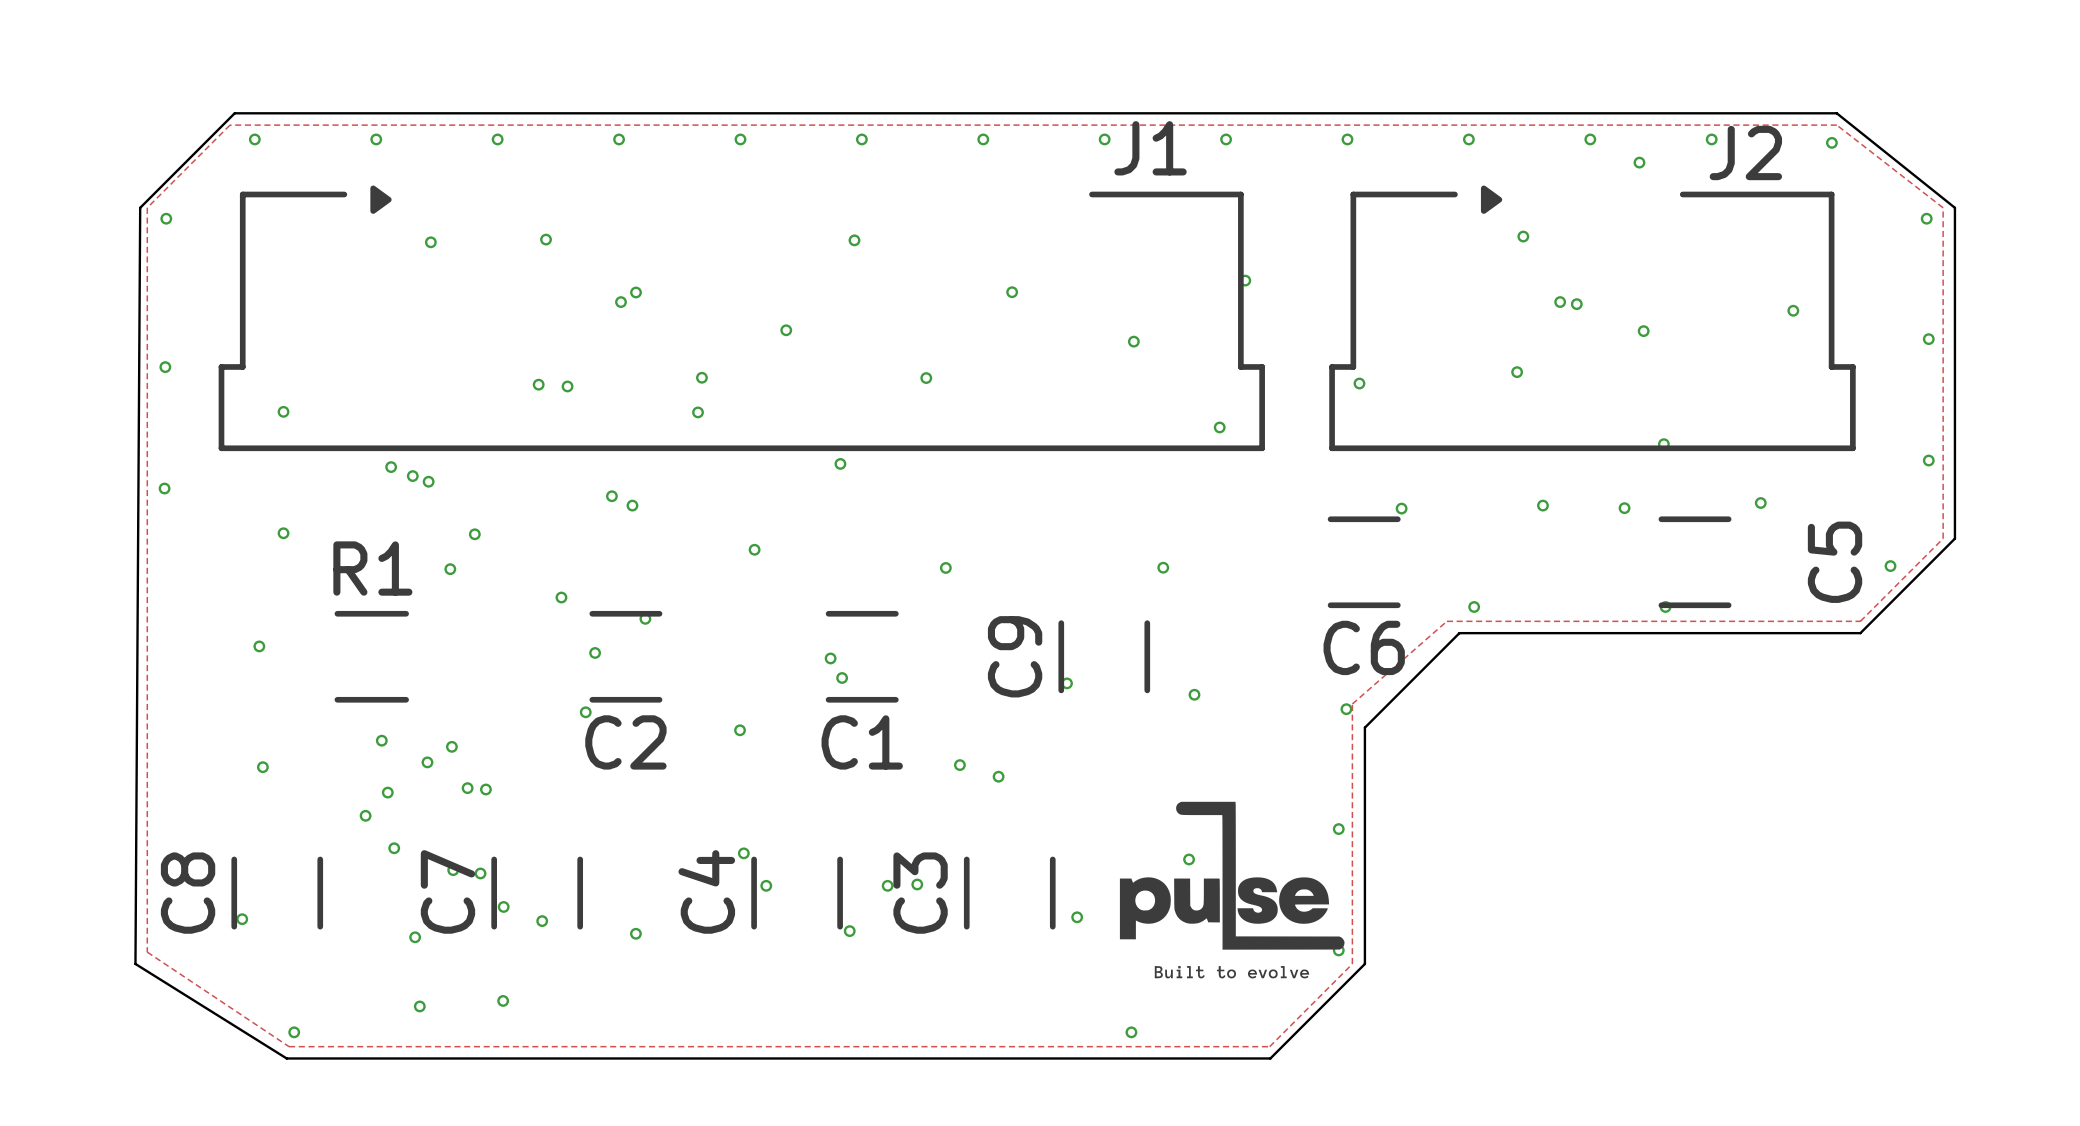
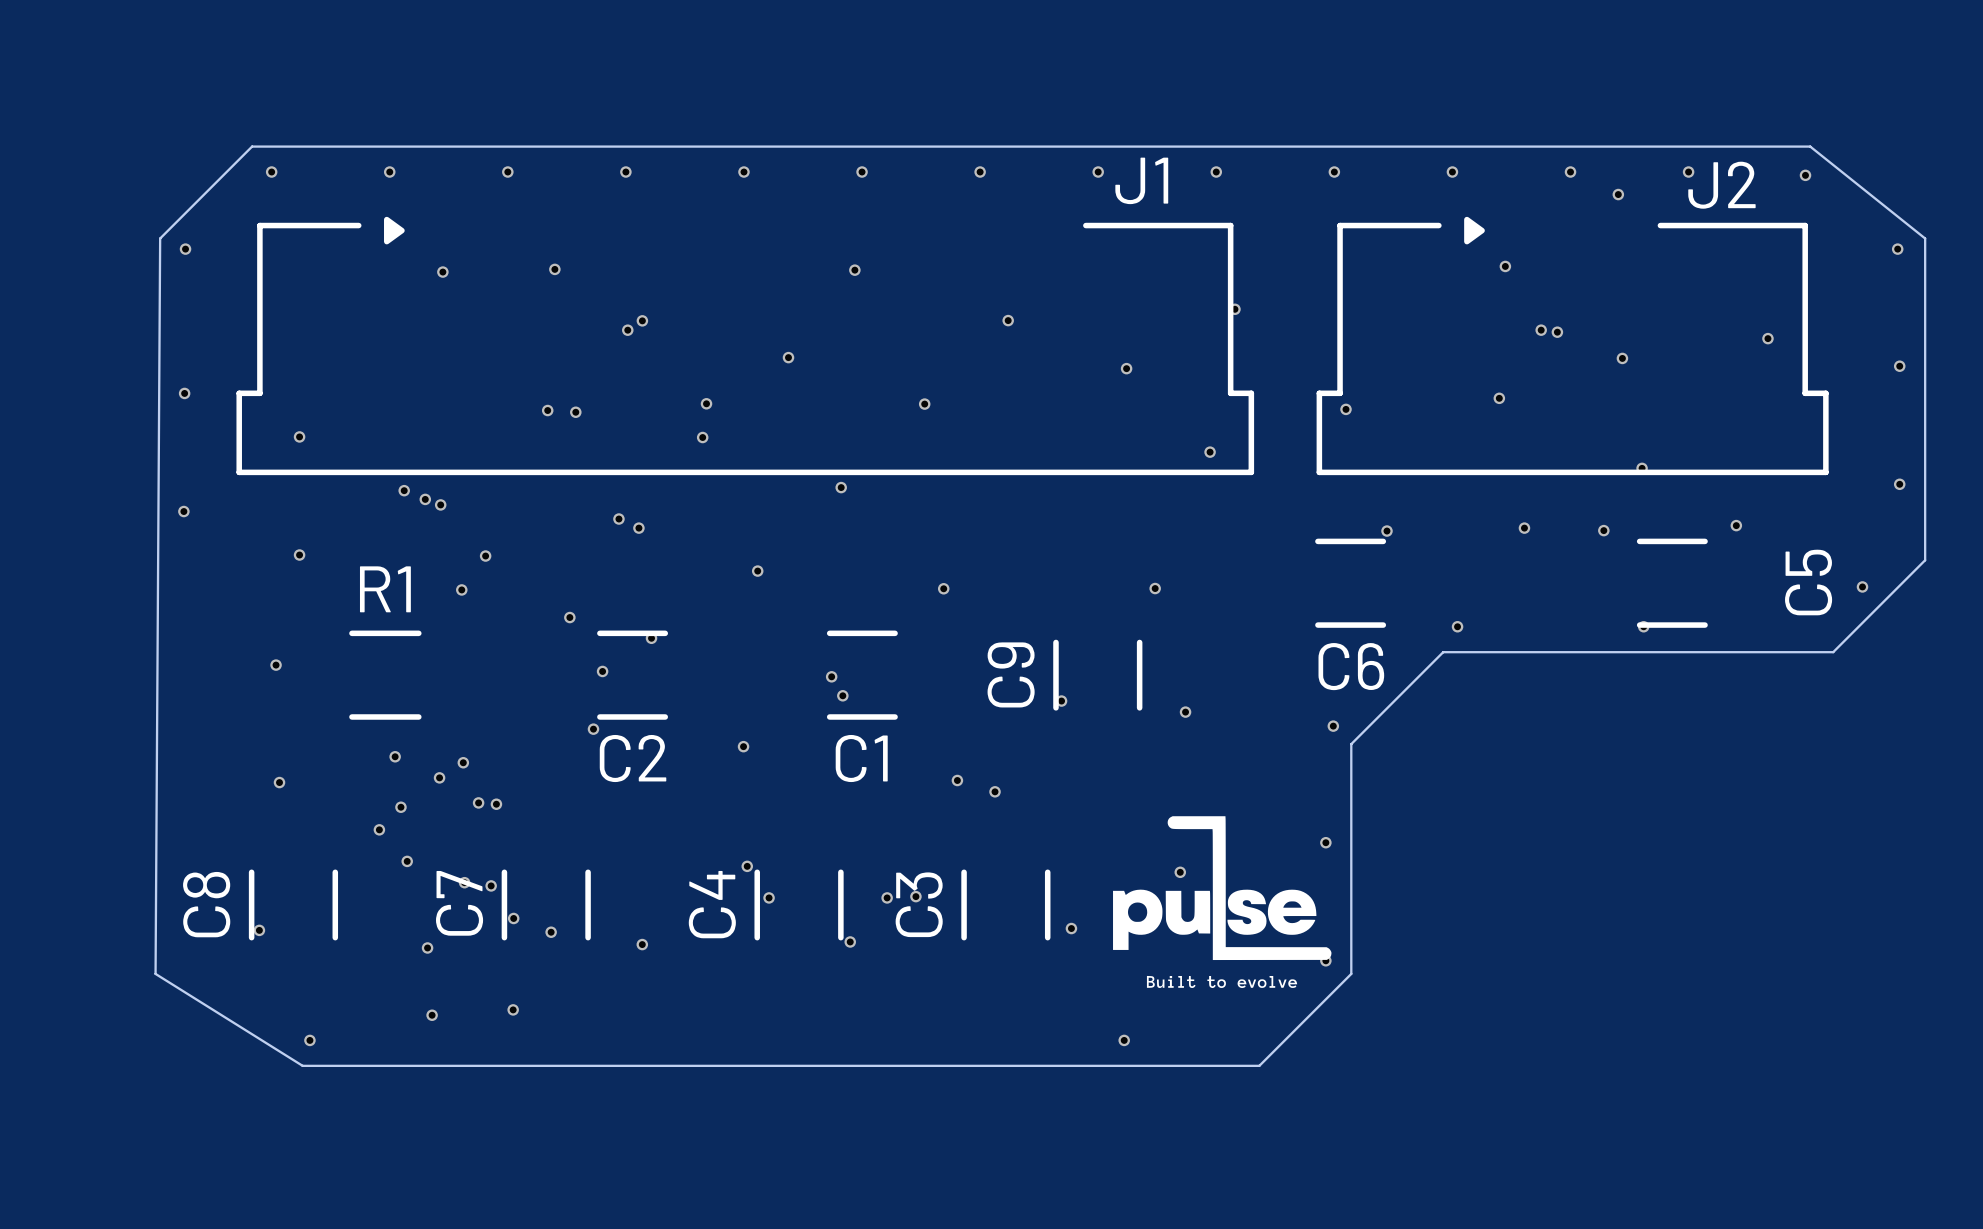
zone outline: (229, 125) (1836, 125) (1943, 207) (1943, 538) (1860, 621) (1446, 621) (1352, 704) (1352, 963) (1269, 1046) (289, 1046) (147, 952) (147, 207) (229, 125) -> none

